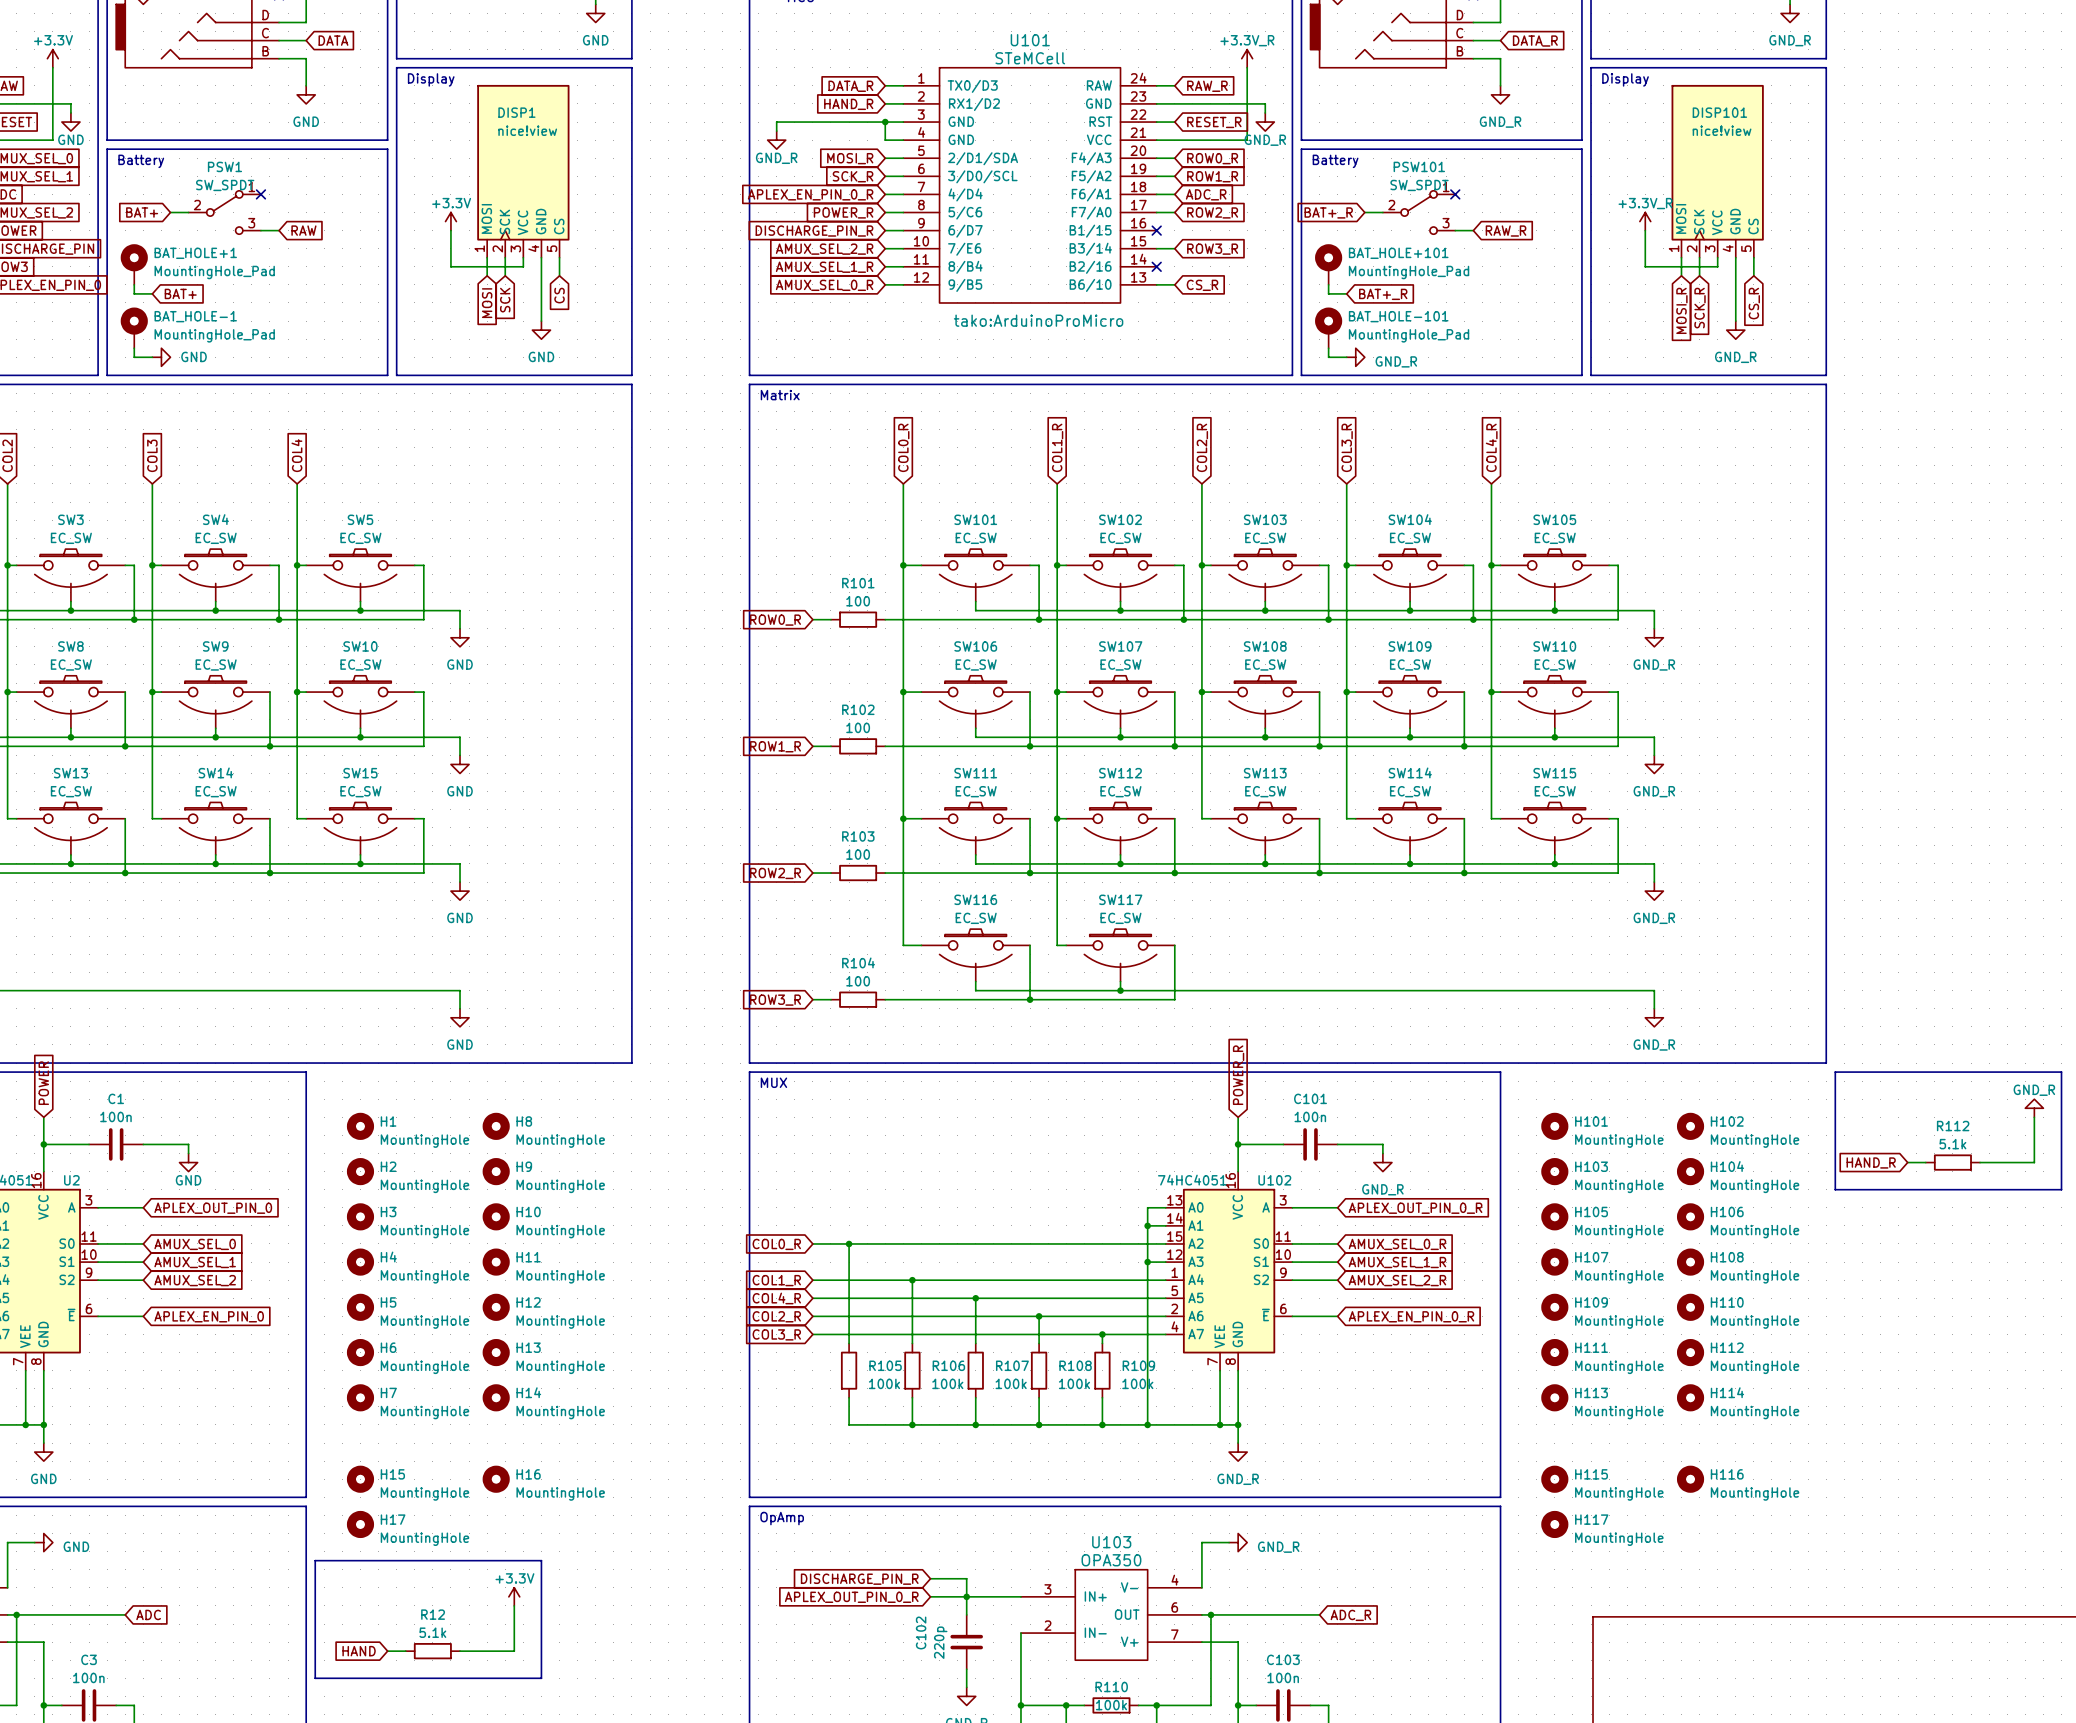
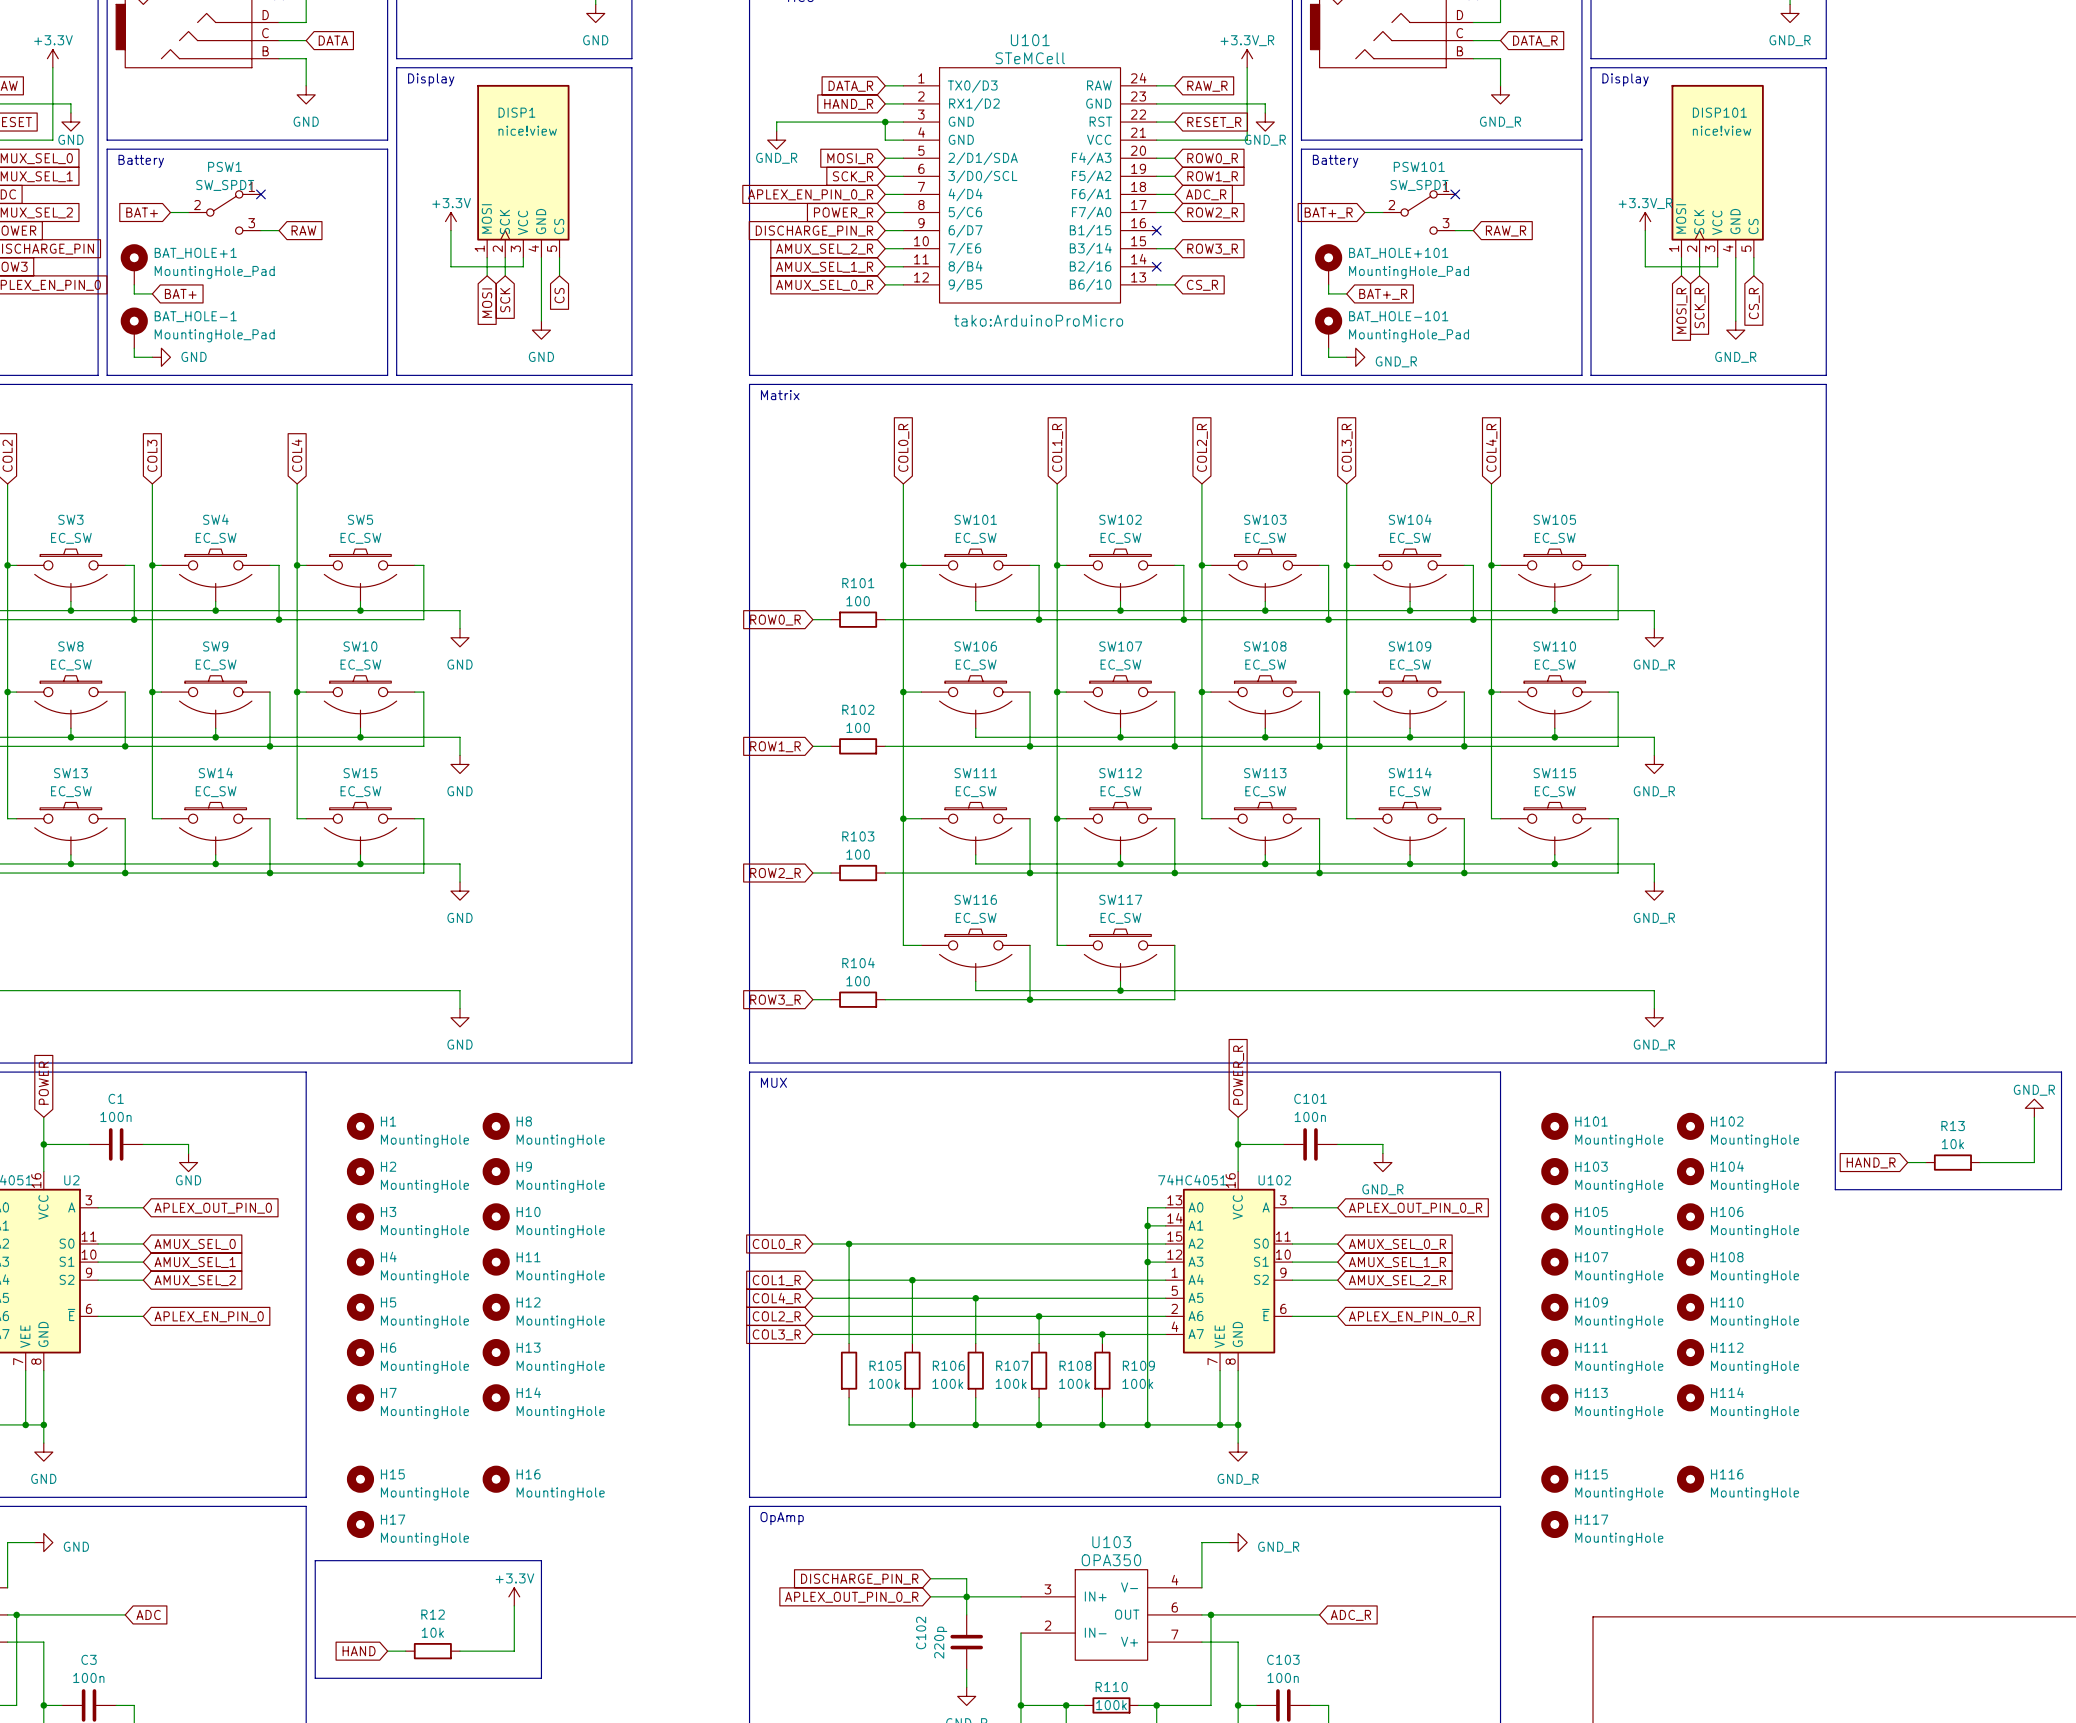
R112 name: R112 (1953, 1126) -> R13 (1953, 1126)
R112 value: 5.1k (1952, 1144) -> 10k (1952, 1144)
R12 value: 5.1k (432, 1632) -> 10k (432, 1632)

